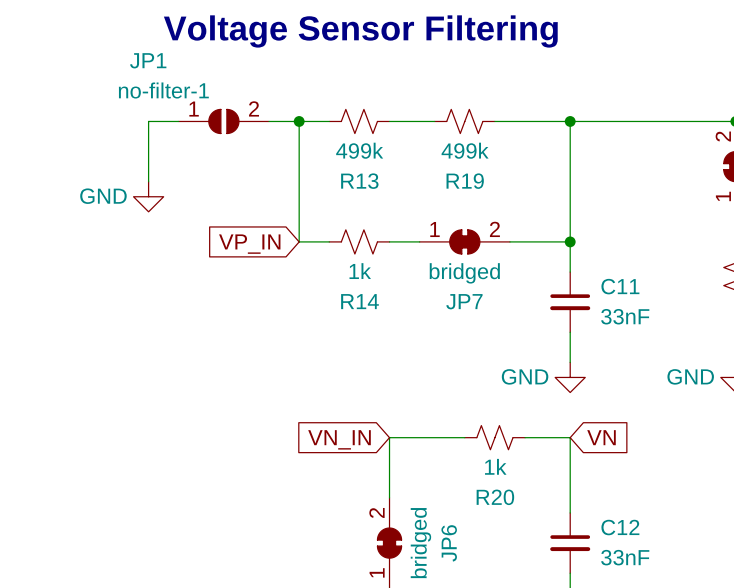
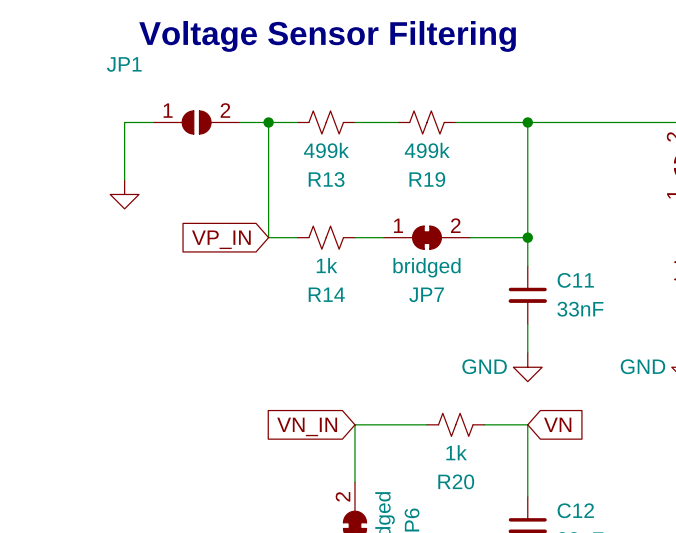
JP1 value: no-filter-1 (163, 90) -> none
power symbol text: GND (103, 196) -> none

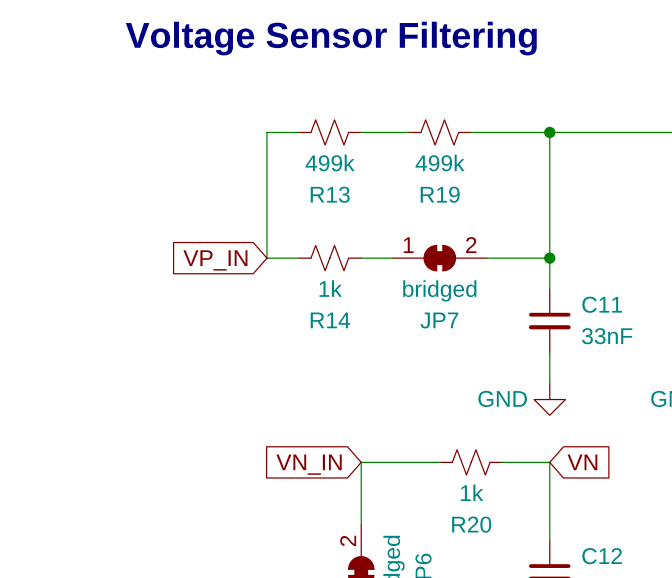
wire: (153, 122) (124, 122) (124, 180) -> none
JP1: (196, 122) -> none
wire: (239, 122) (268, 122) -> none
junction: (268, 122) -> none
power symbol: (124, 194) -> none

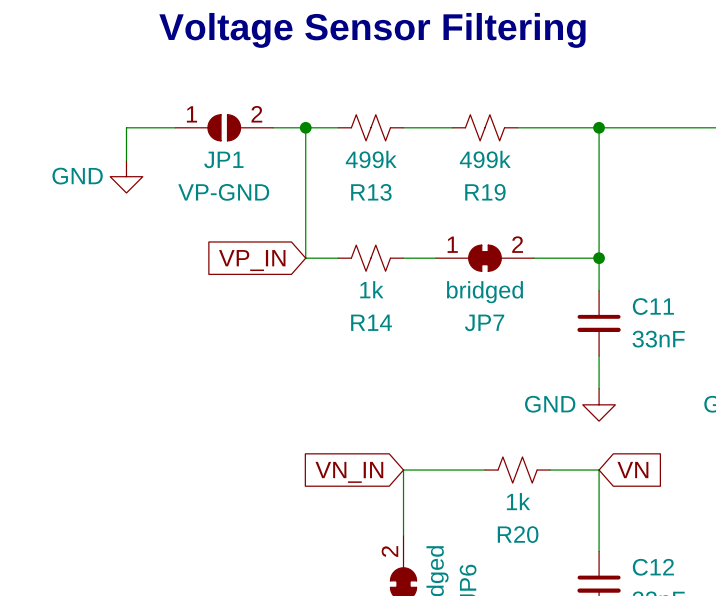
wire: none -> (175, 127) (126, 127) (126, 160)
JP1: none -> VP-GND (224, 127)
wire: none -> (273, 127) (305, 127)
junction: none -> (305, 127)
power symbol: none -> GND (126, 176)

